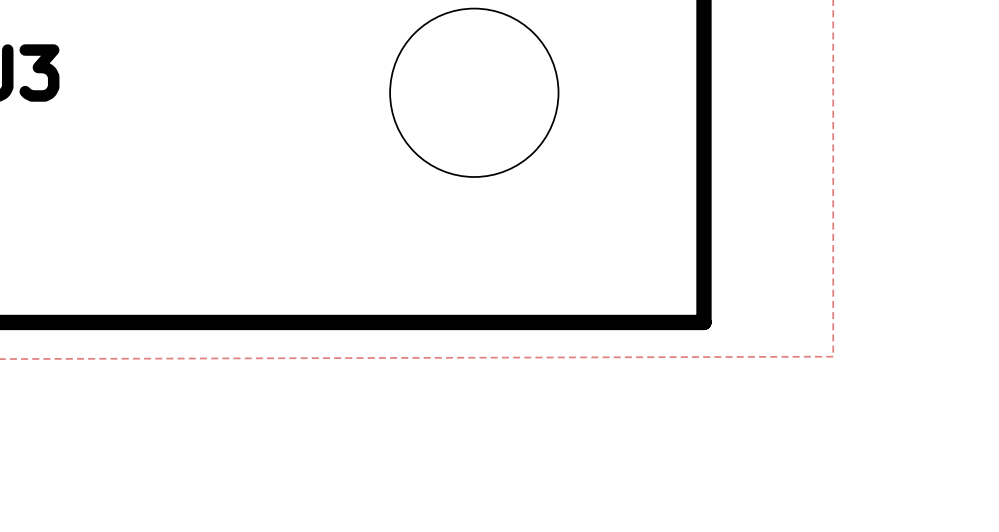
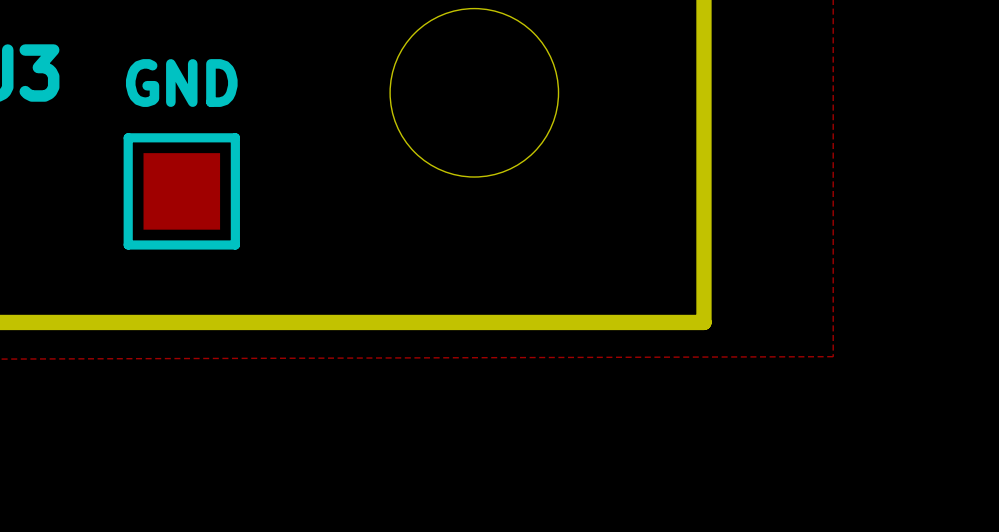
text: none -> GND (181, 83)
part: none -> (181, 191)

